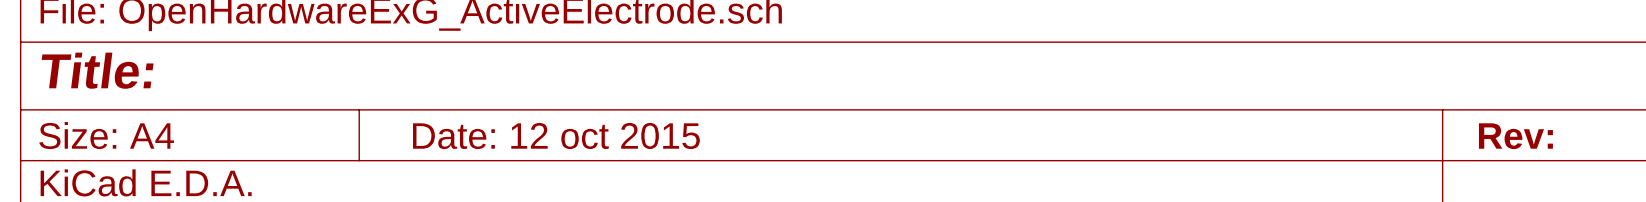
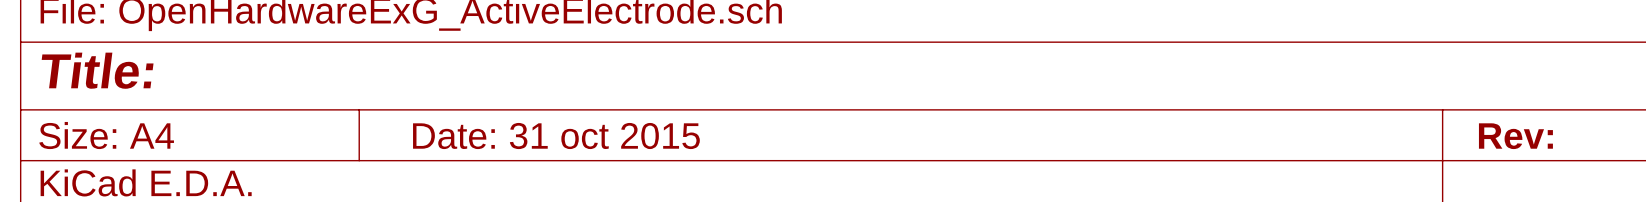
title block: Date: 12 oct 2015 (556, 136) -> Date: 31 oct 2015 (556, 136)

